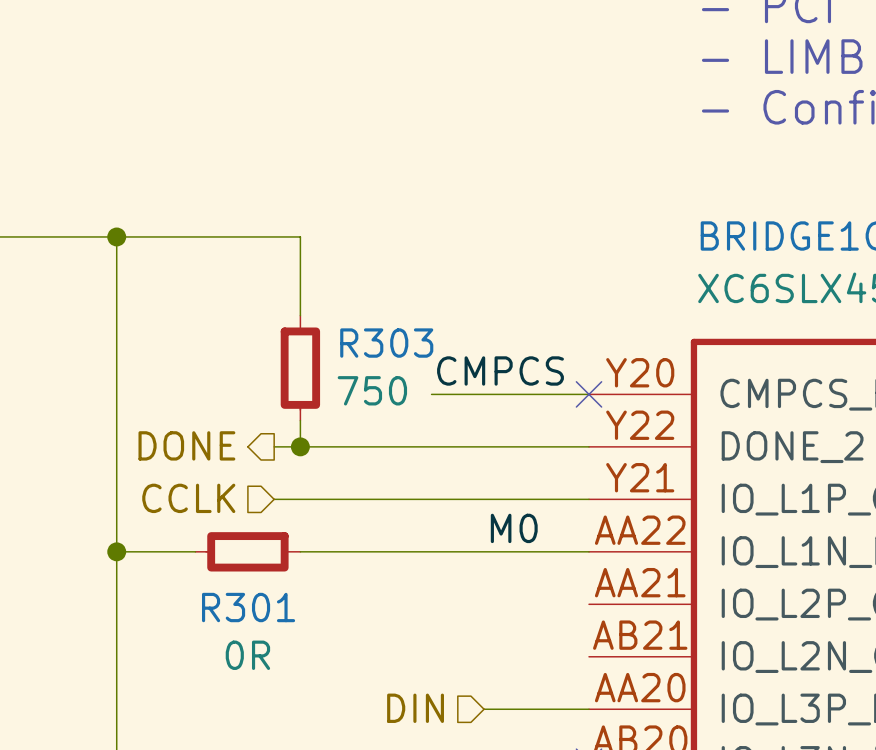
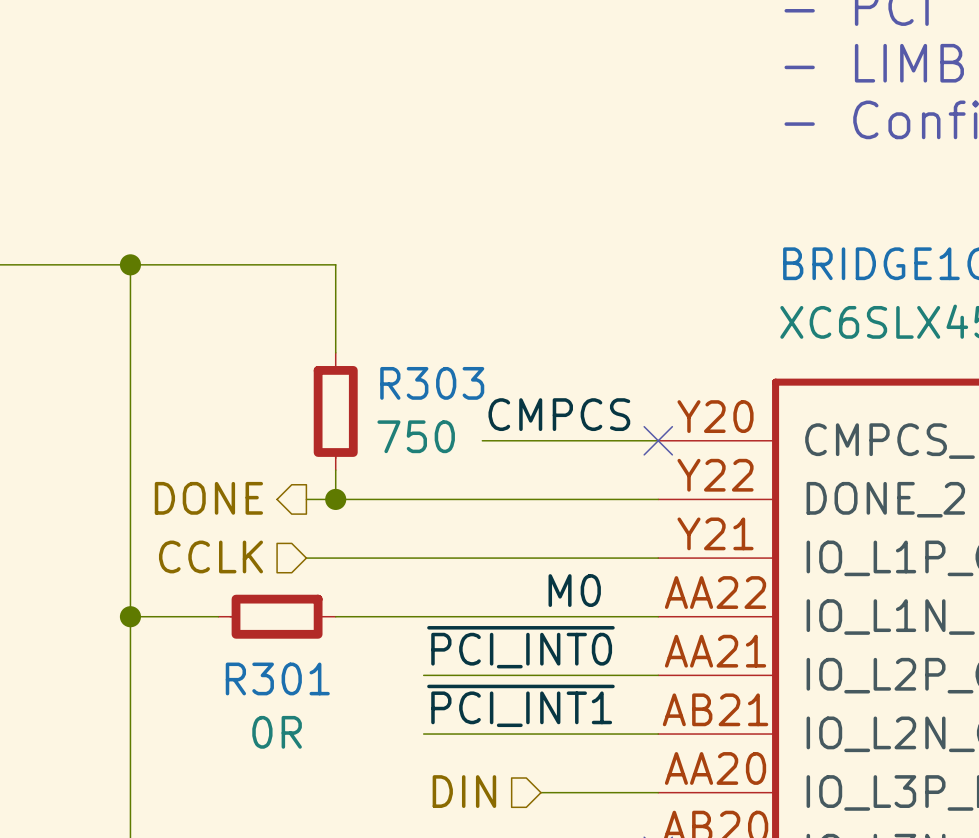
label: none -> ~{PCI_INT0} (520, 647)
wire: none -> (423, 675) (658, 675)
label: none -> ~{PCI_INT1} (520, 705)
wire: none -> (423, 734) (658, 734)

